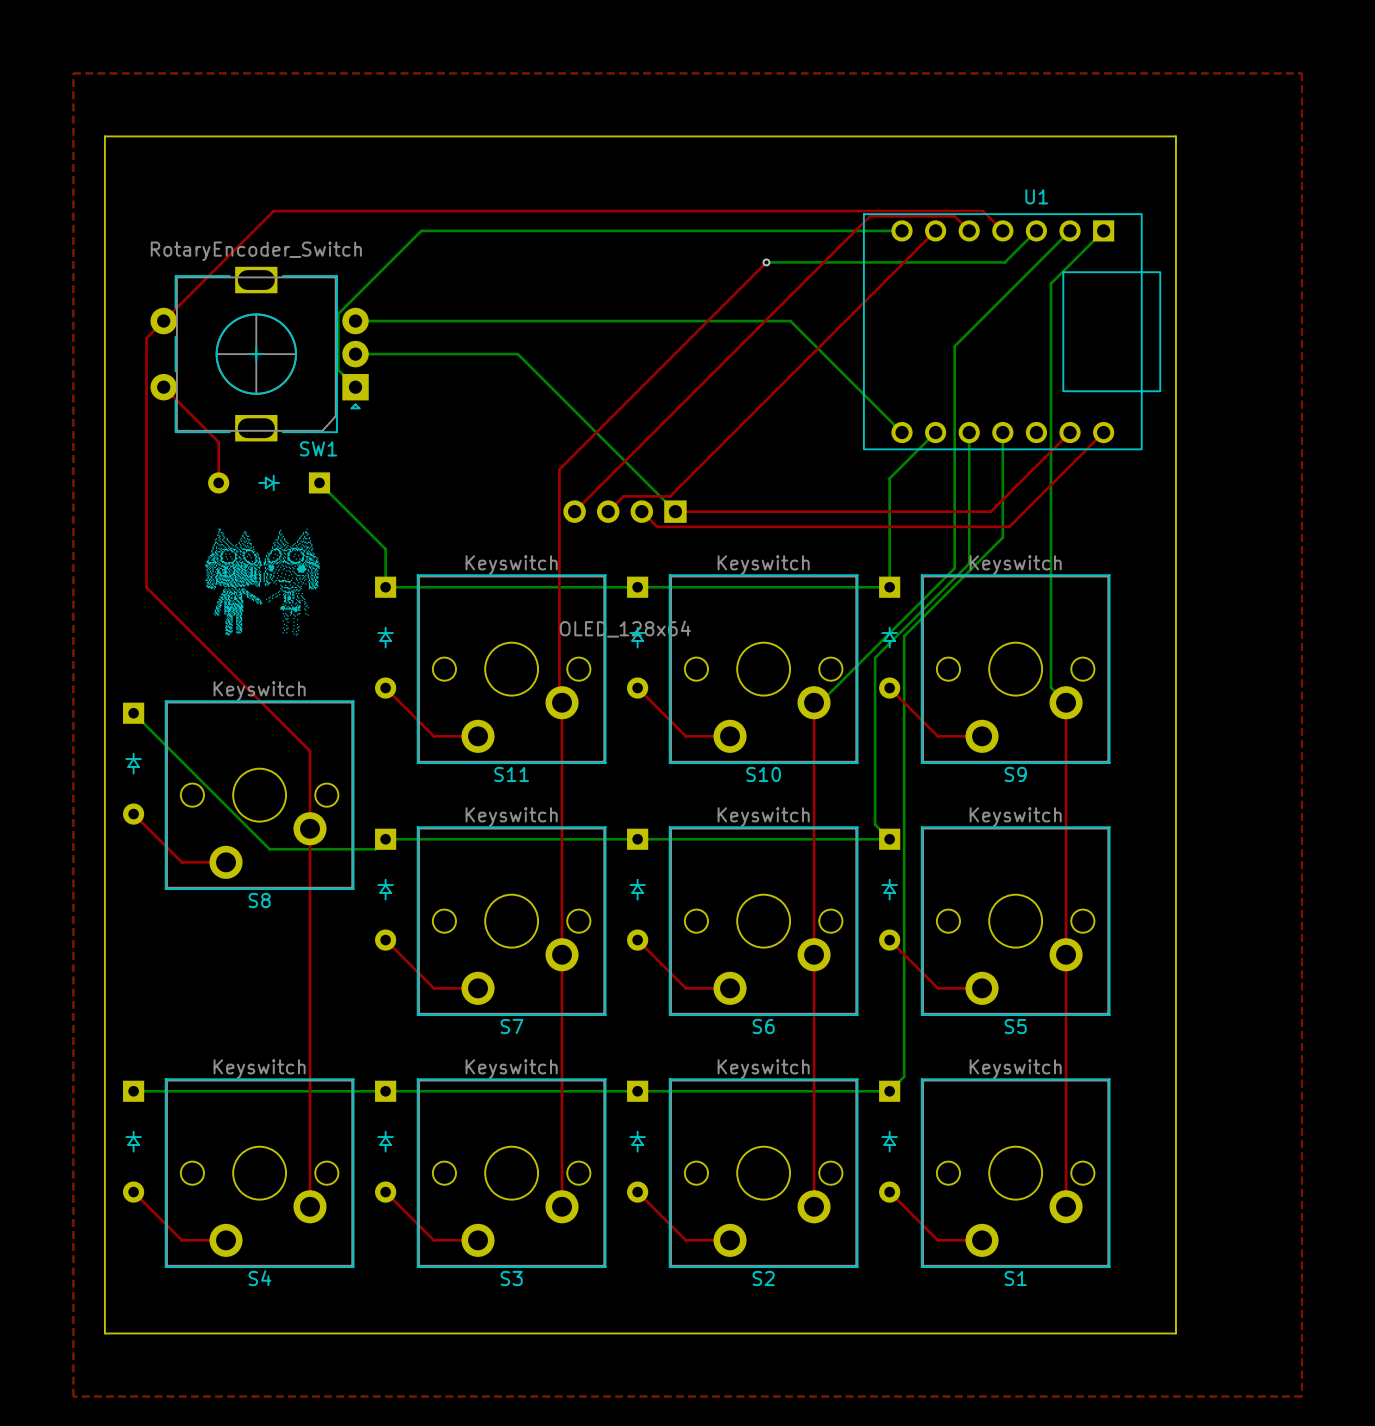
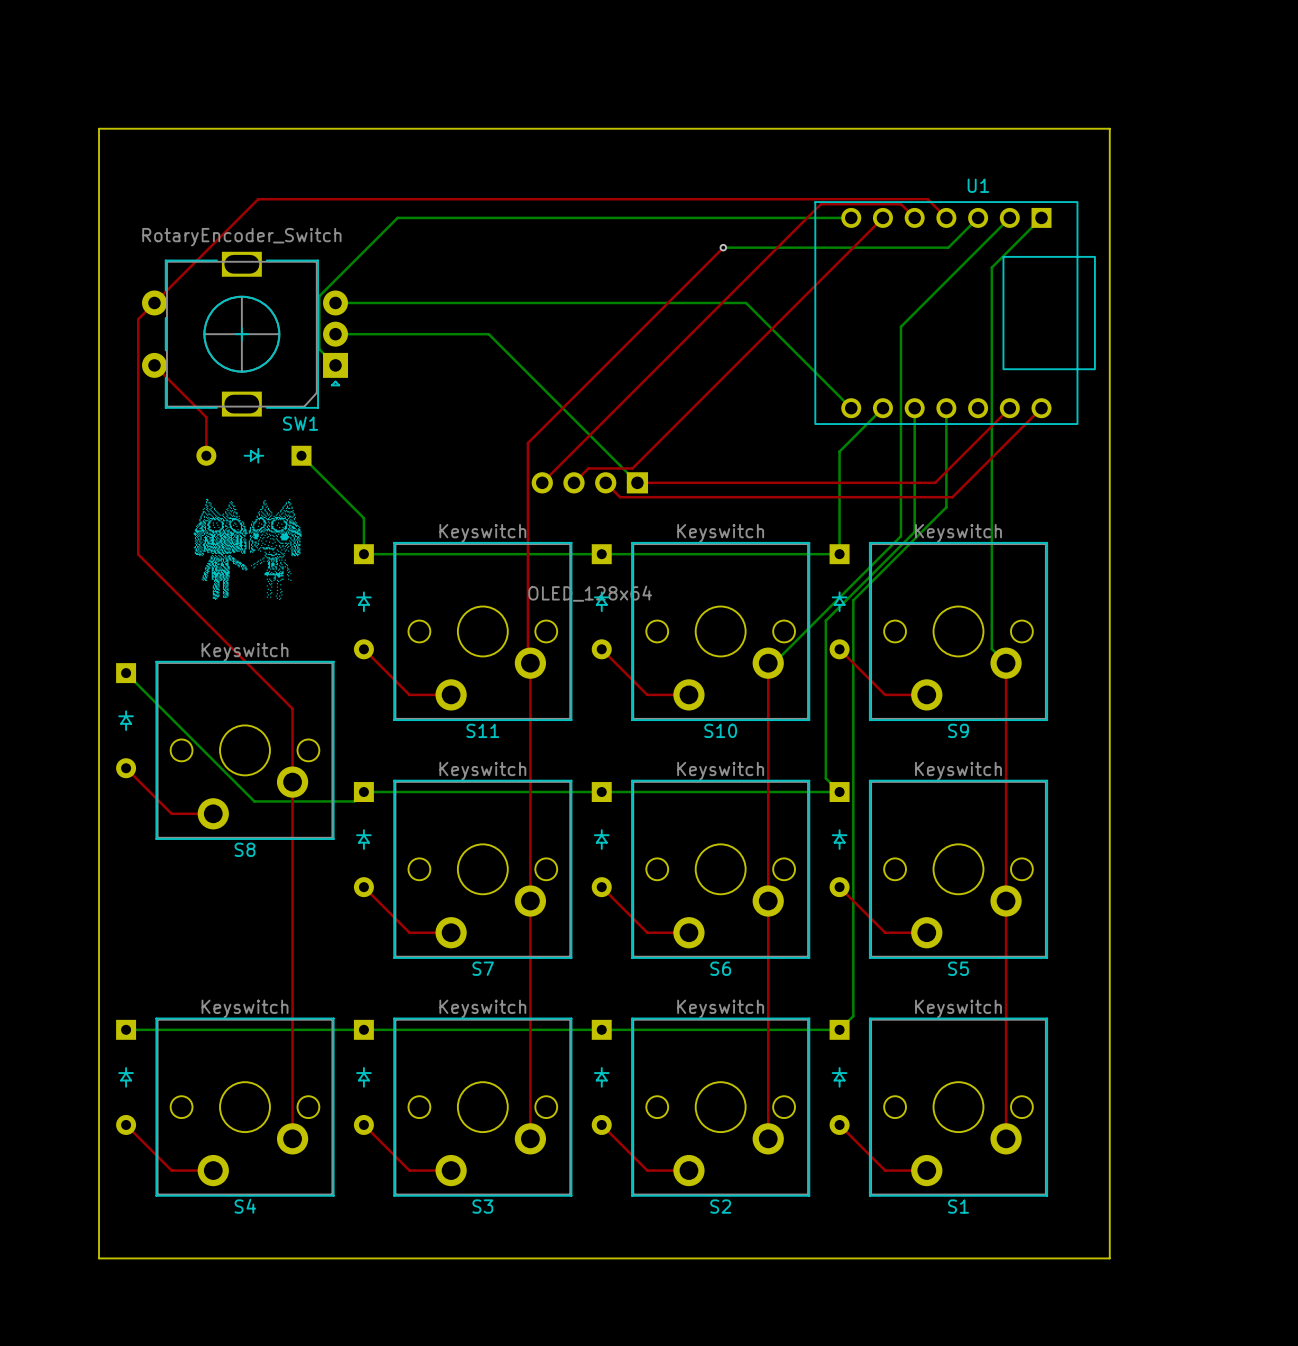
top zone outline: (73, 73) (73, 1396) (1301, 1396) (1301, 73) (73, 73) -> none

